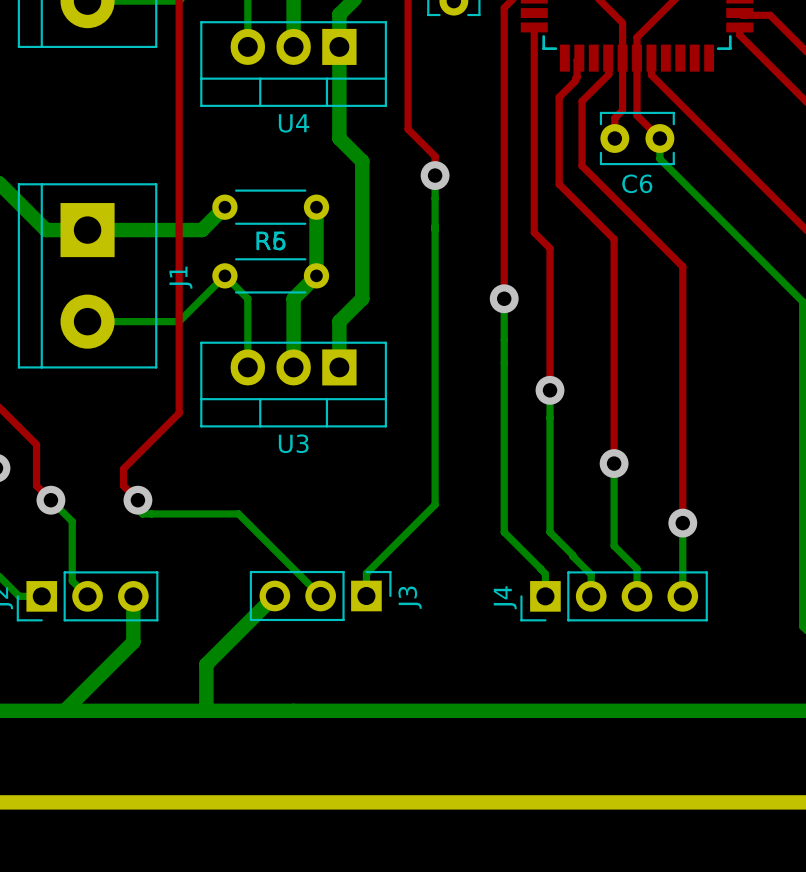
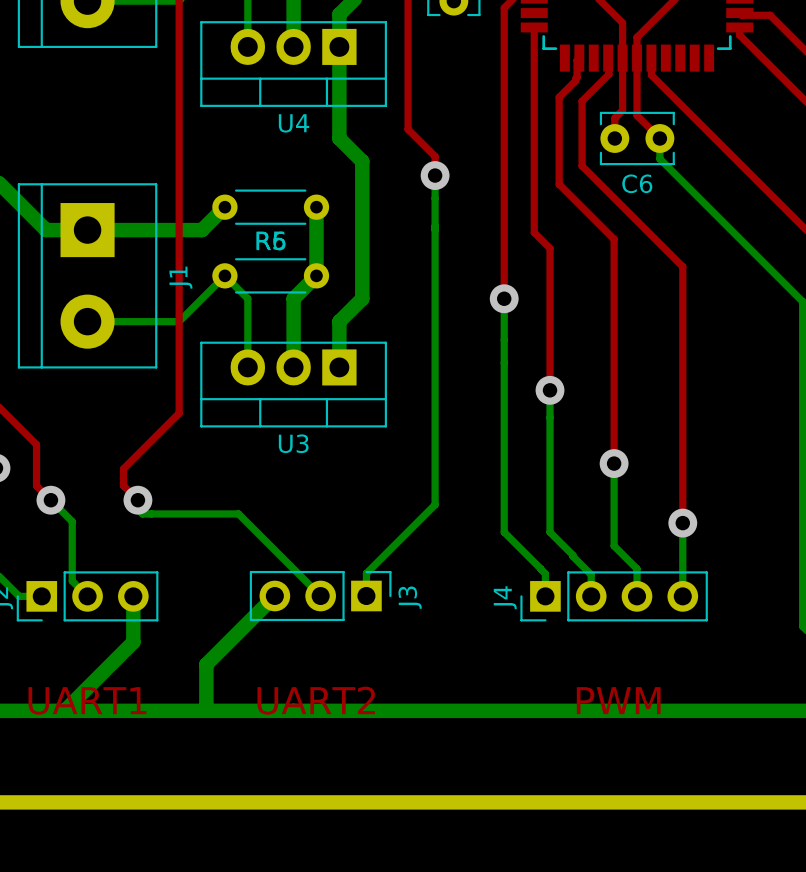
text: none -> UART1 (87, 700)
text: none -> UART2 (316, 700)
text: none -> PWM (618, 700)

